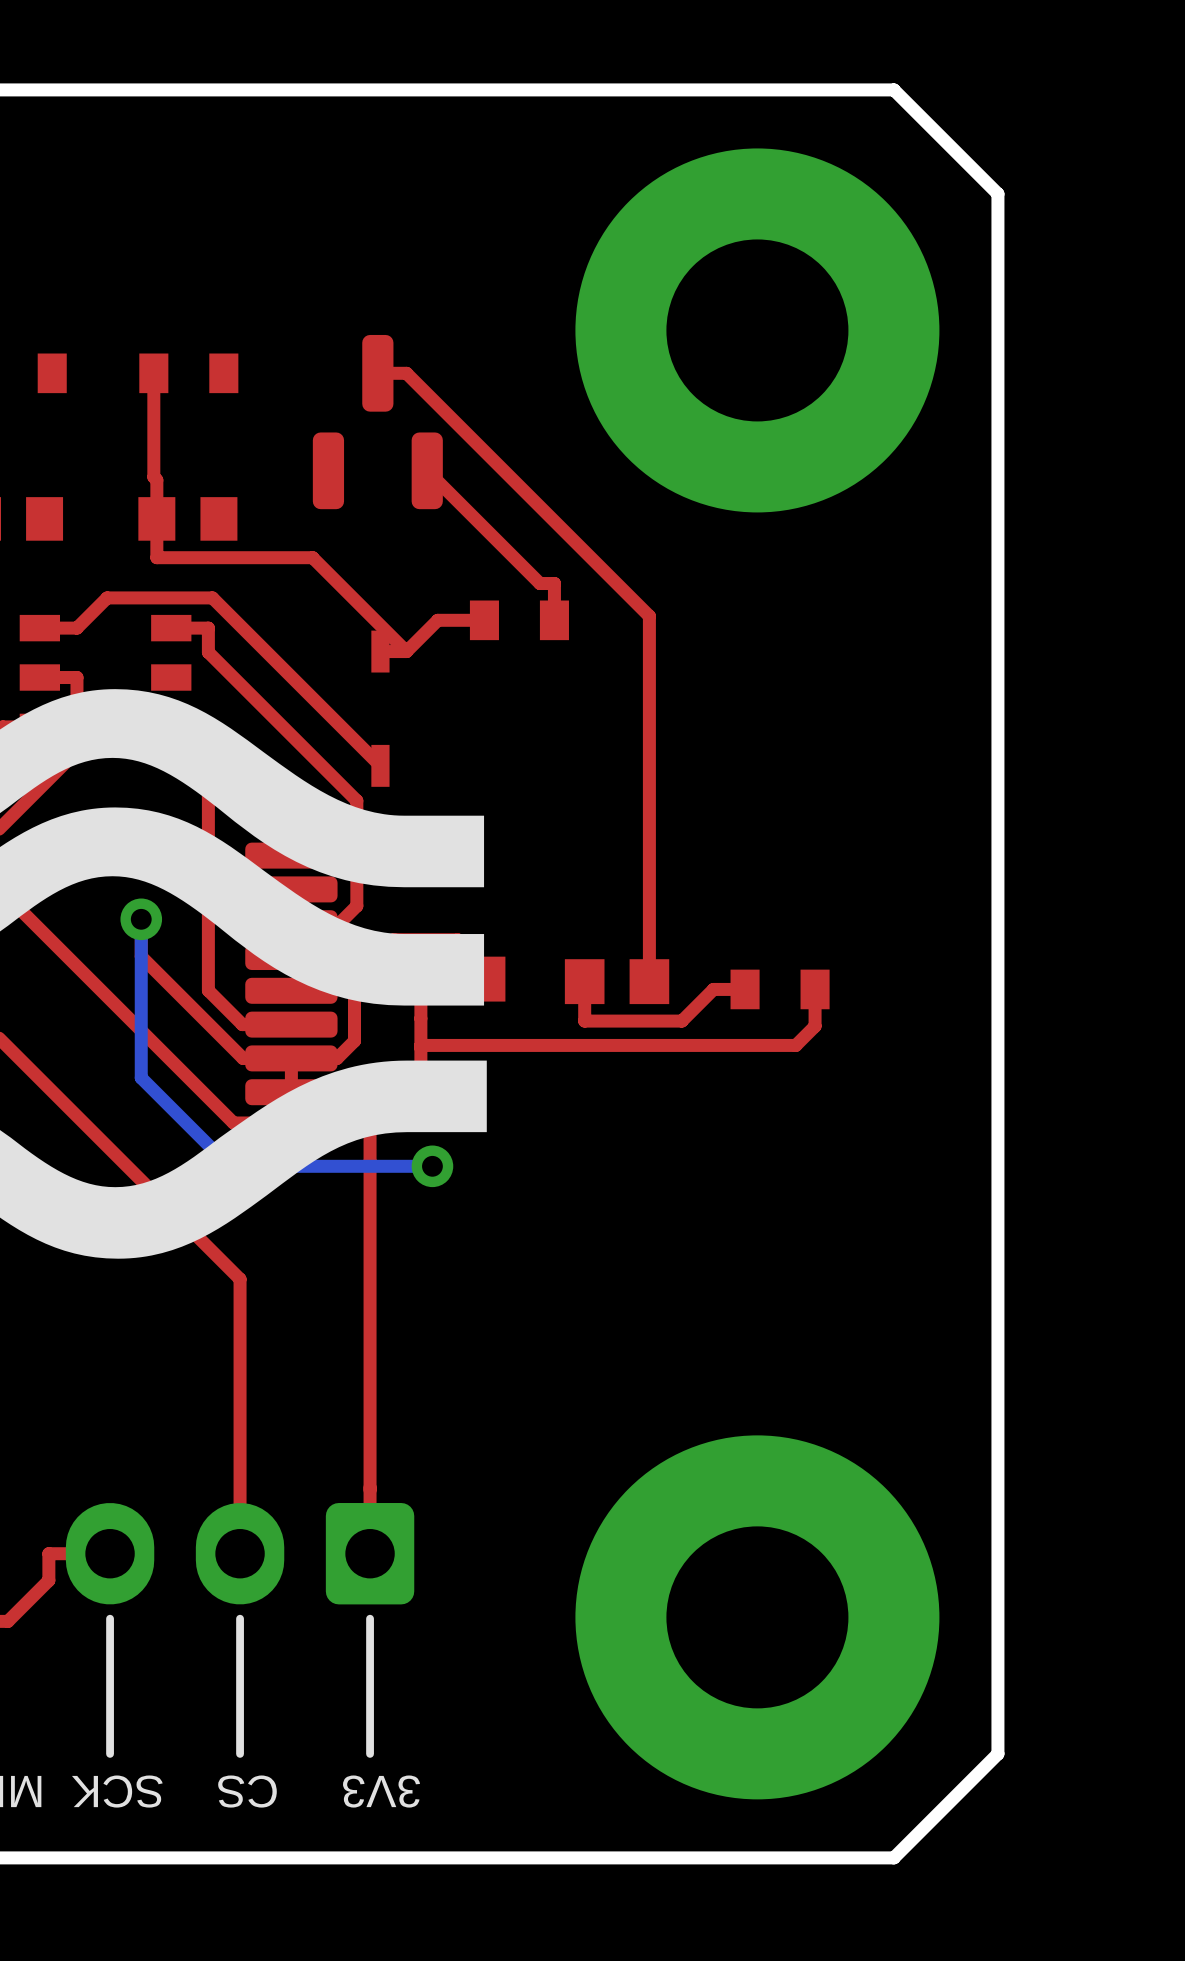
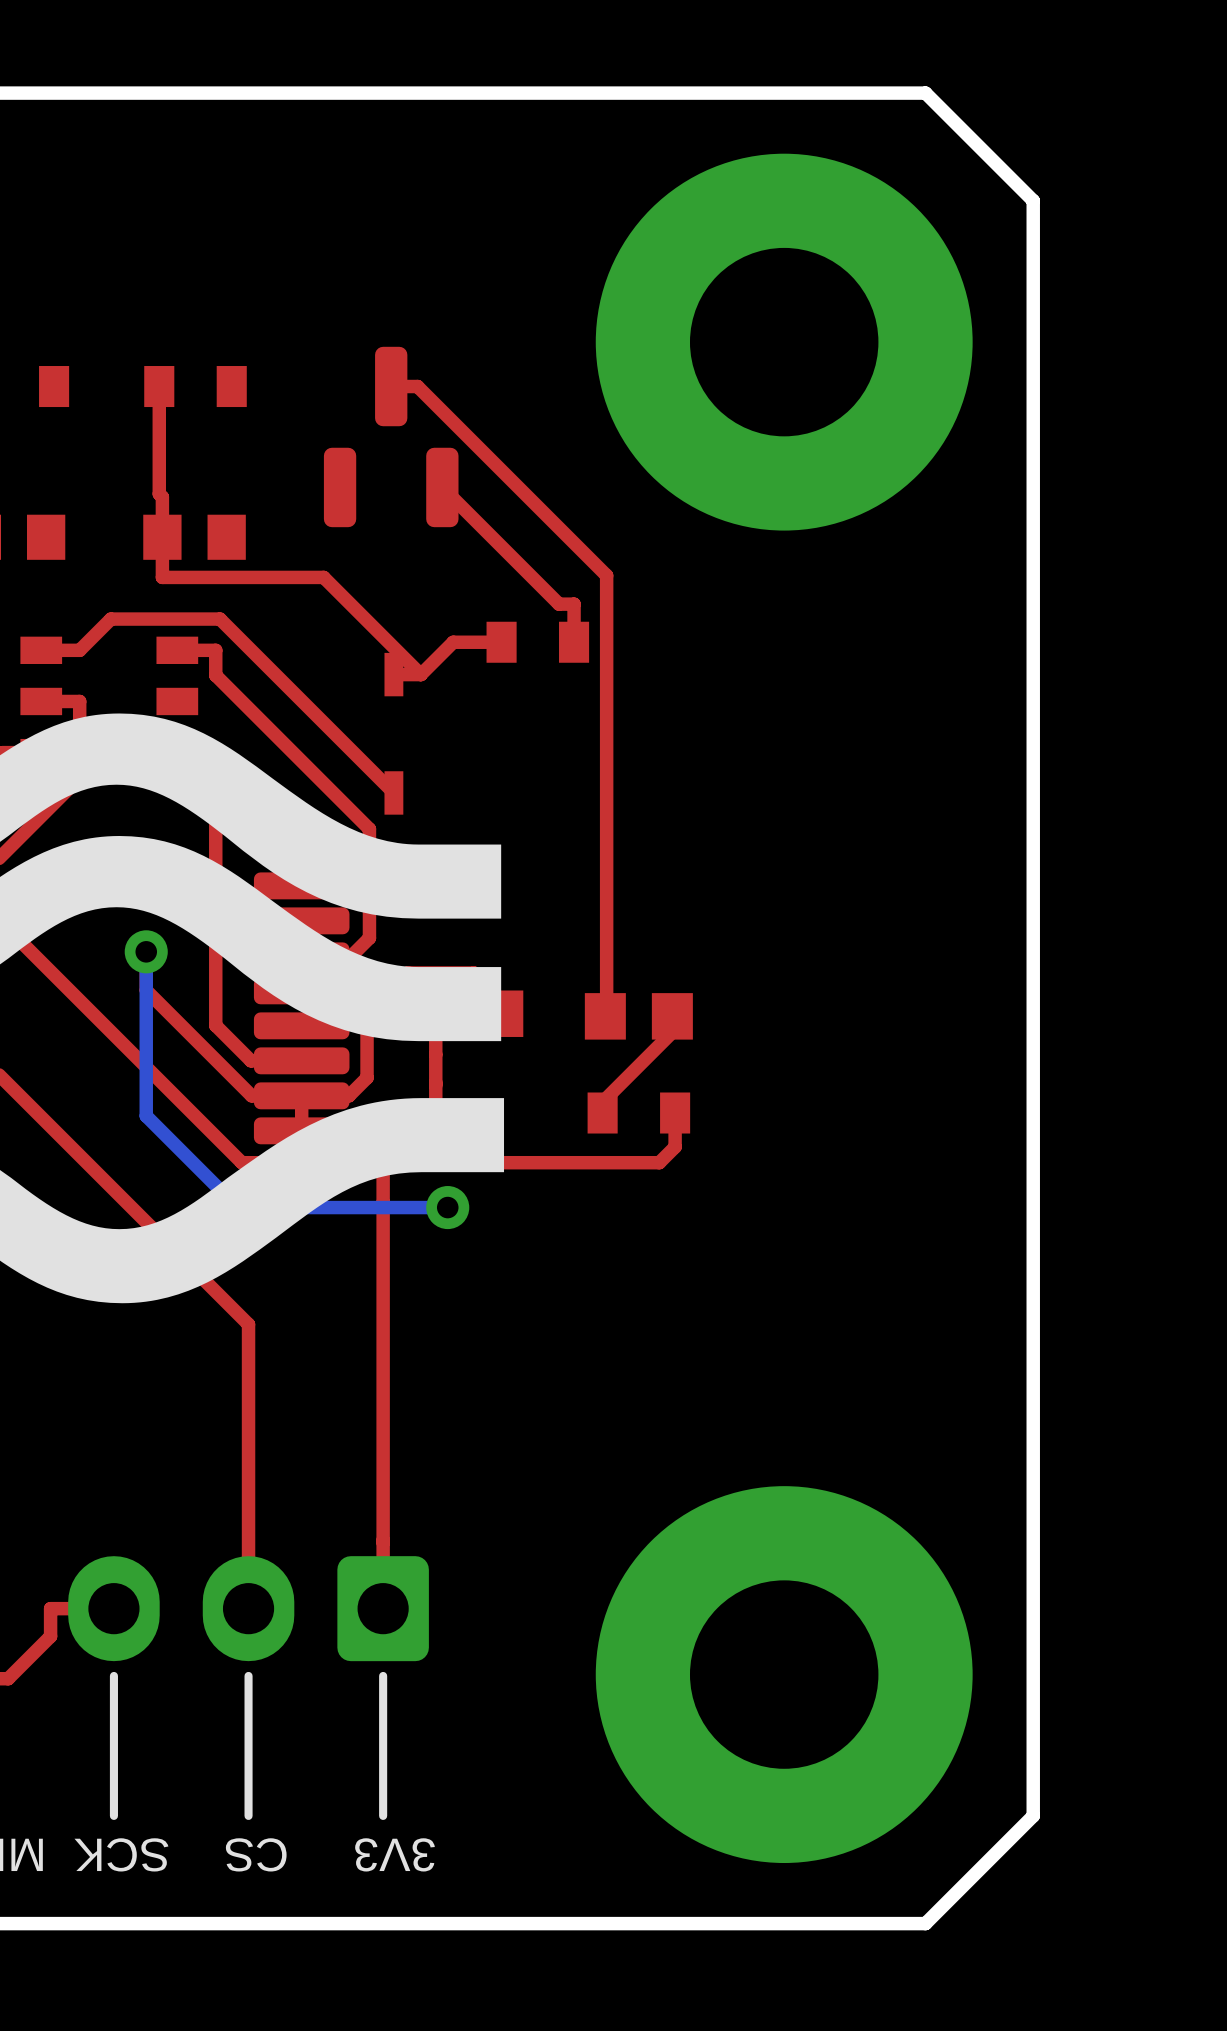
top track: (403, 373) (406, 373) (649, 616) (649, 980) -> (417, 386) (606, 575) (605, 1016)
top track: (584, 981) (584, 1021) (681, 1021) (713, 989) (745, 989) -> none
top track: none -> (672, 1016) (672, 1032) (602, 1102) (602, 1113)
part position: (780, 989) -> (638, 1113)
top track: (815, 989) (815, 1026) (795, 1045) (420, 1045) -> none
top track: none -> (675, 1113) (675, 1146) (659, 1162) (383, 1162)

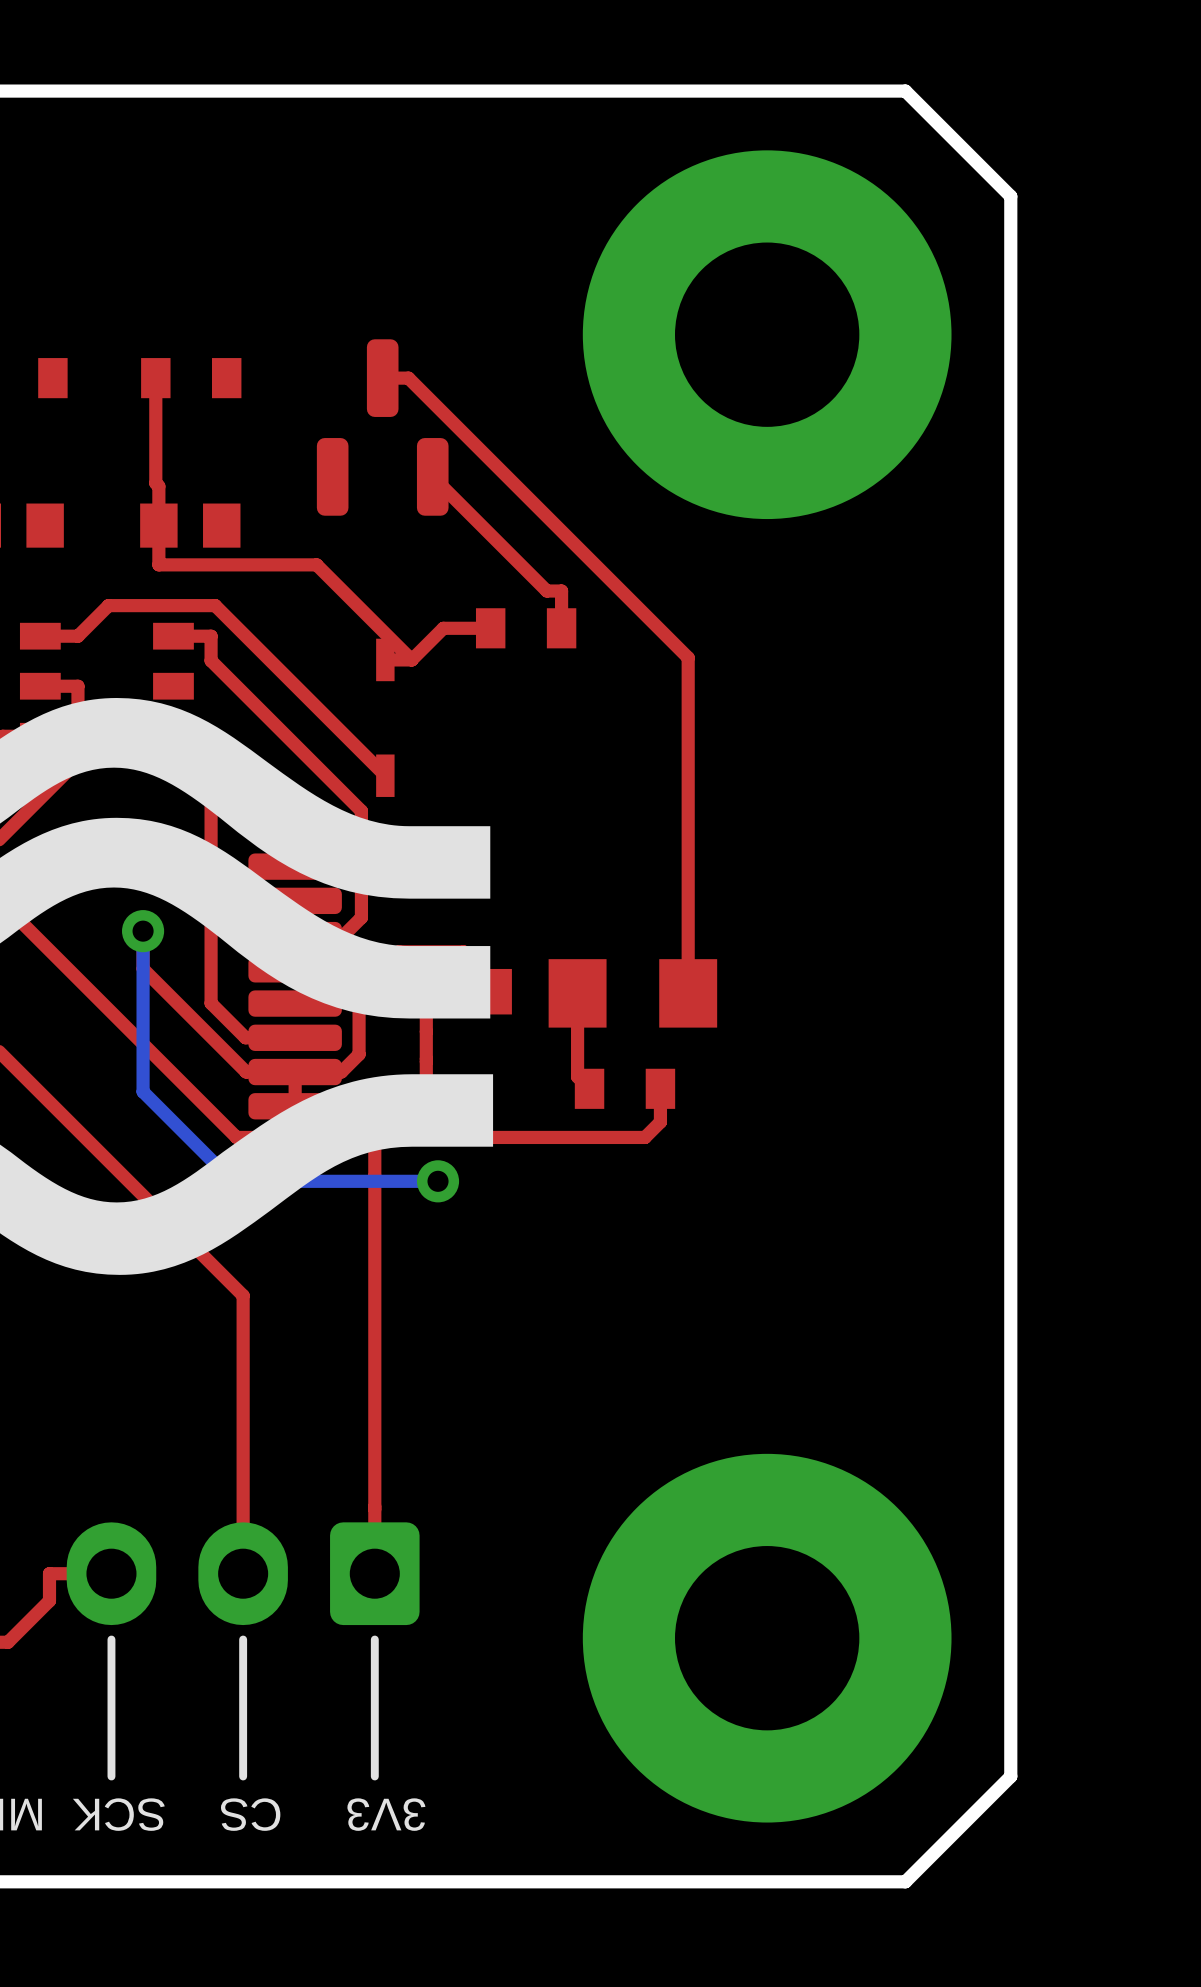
top track: (606, 575) (606, 1015) -> (593, 563) (688, 657) (688, 993)
part footprint: [584, 993, 693, 1040] -> [548, 959, 718, 1028]
top track: none -> (577, 993) (577, 1076) (589, 1088)
top track: (672, 1015) (672, 1032) (602, 1102) -> none

